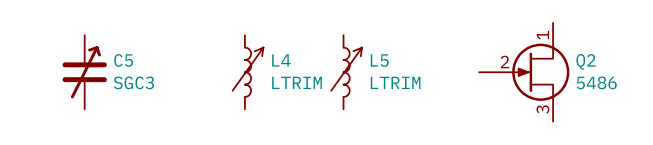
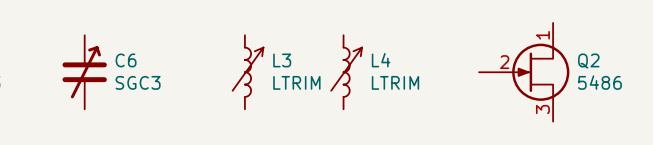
C5 name: C5 (123, 60) -> C6 (126, 60)
L4 name: L4 (281, 60) -> L3 (282, 60)
L5 name: L5 (379, 60) -> L4 (381, 60)

